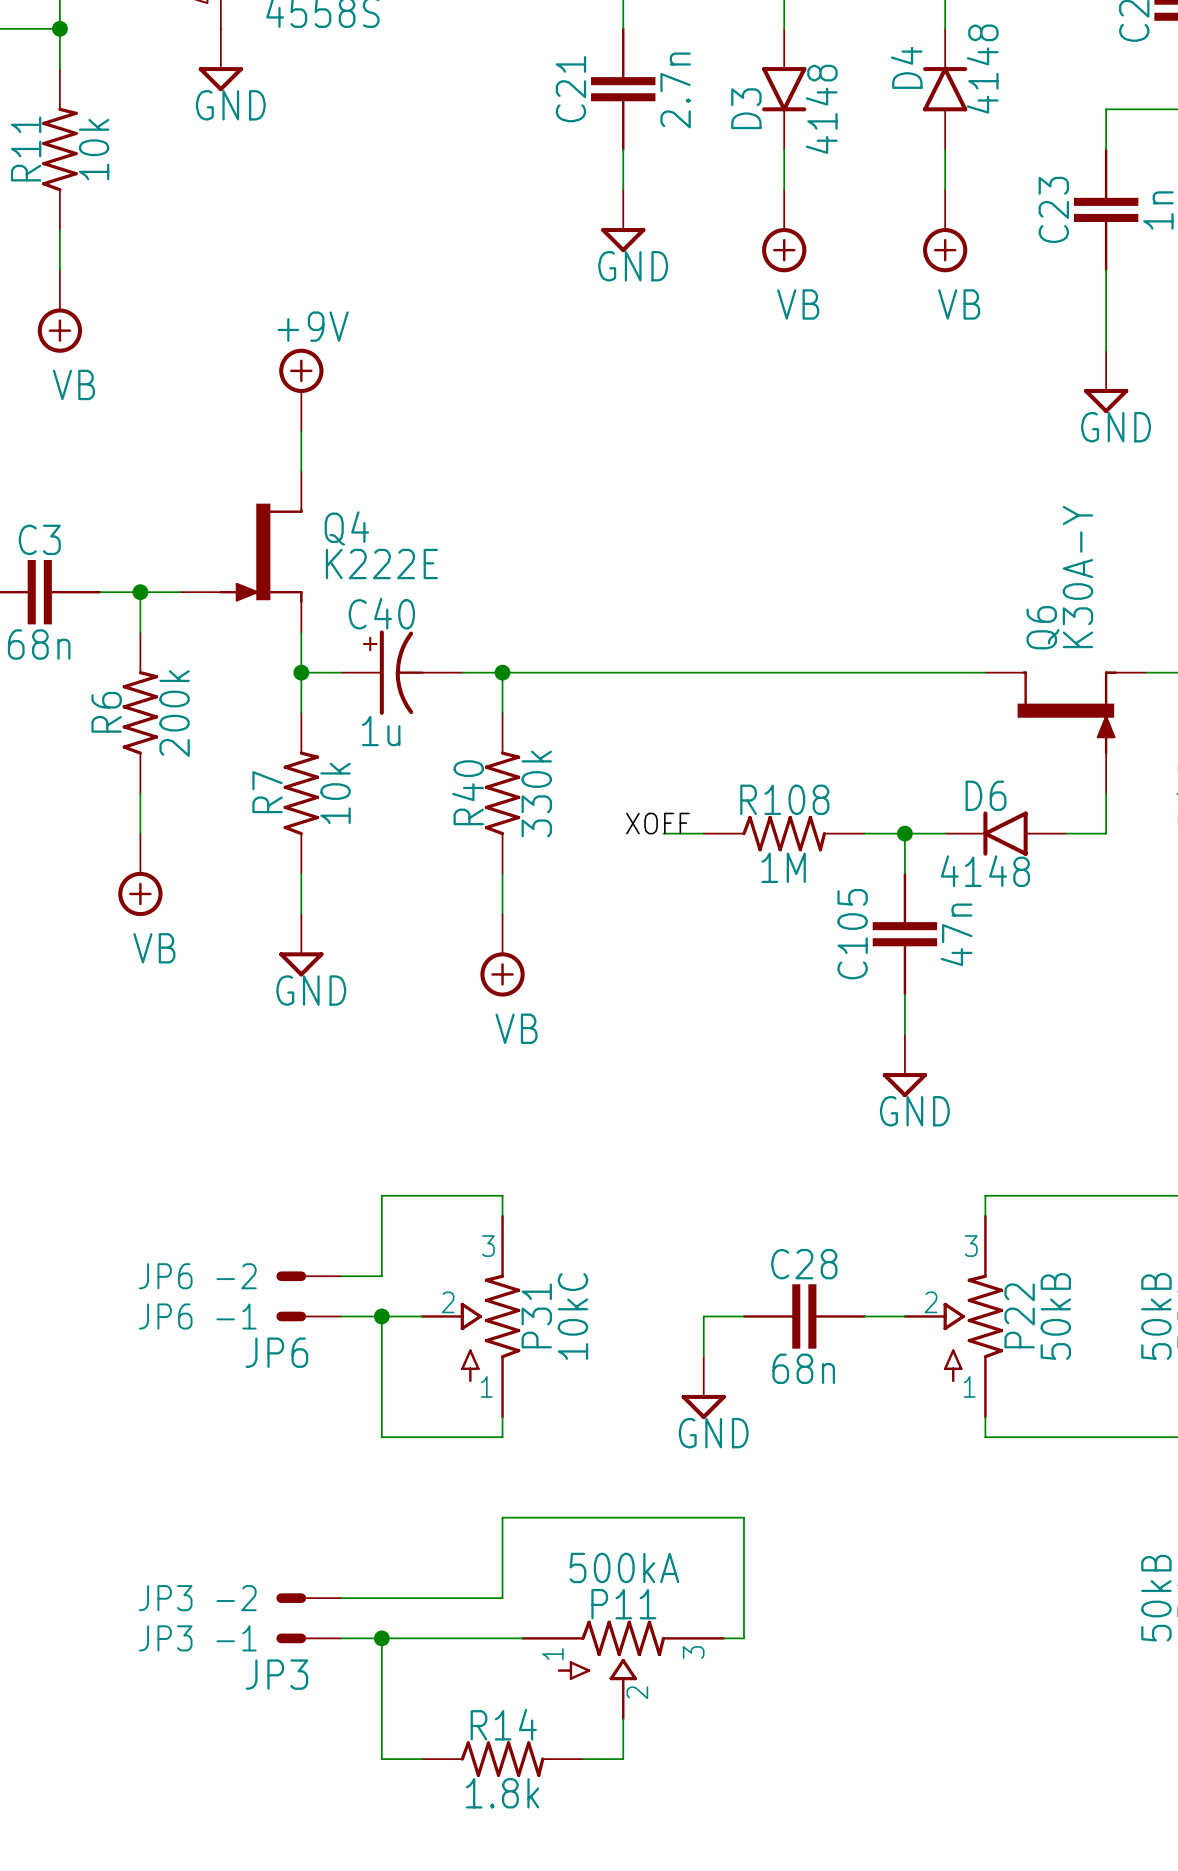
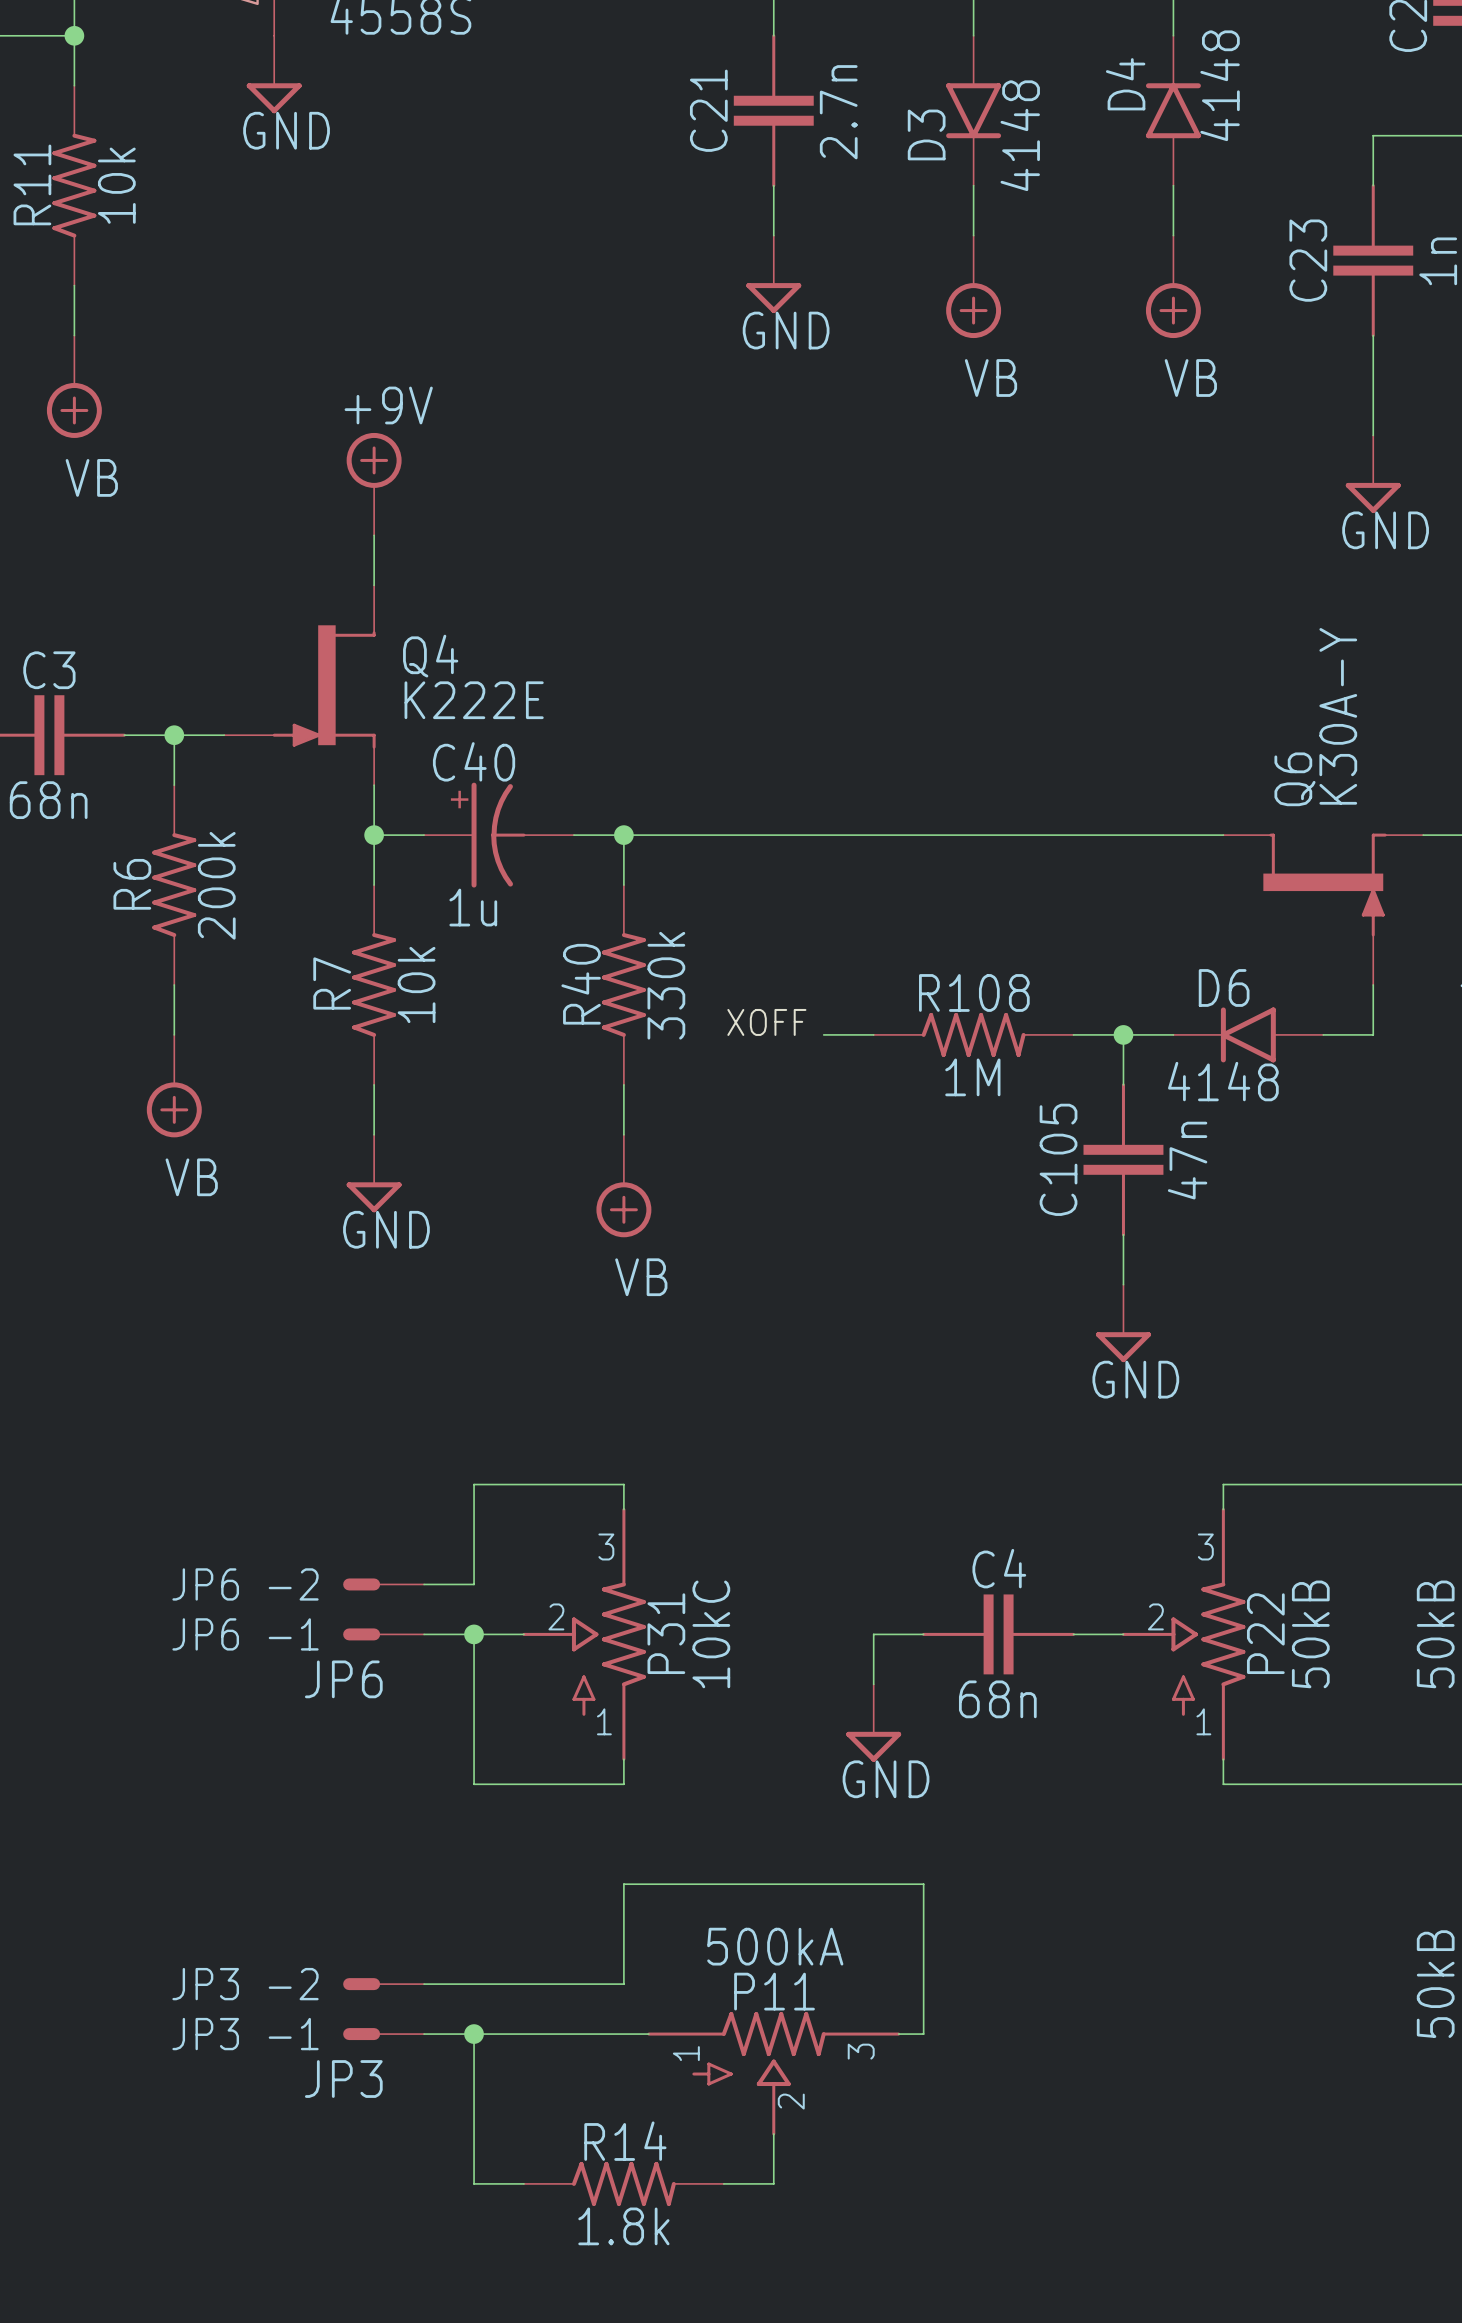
label position: XOFF (657, 823) -> XOFF (766, 1022)
C28 name: C28 (804, 1264) -> C4 (999, 1568)

